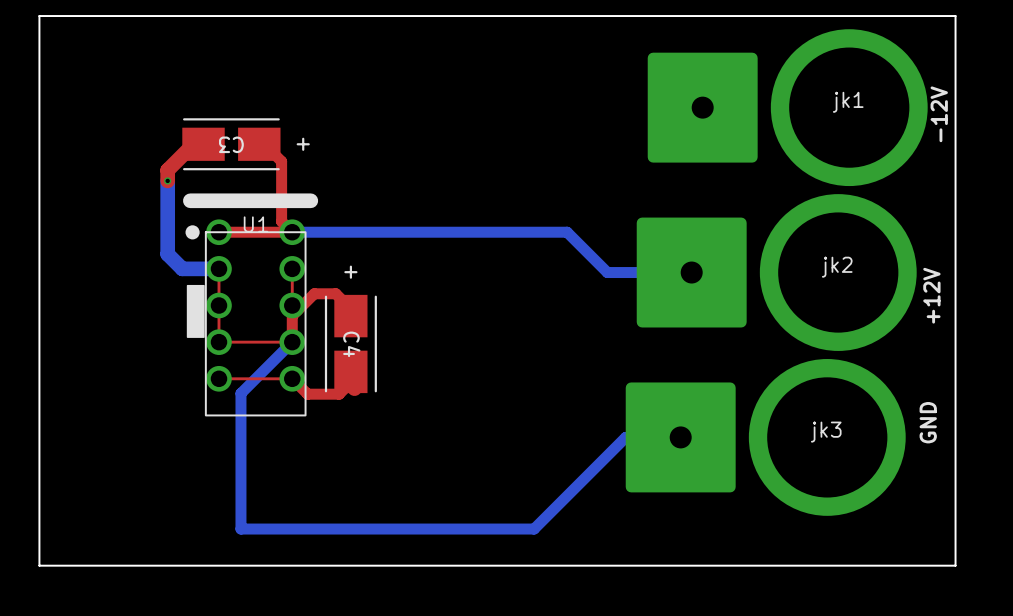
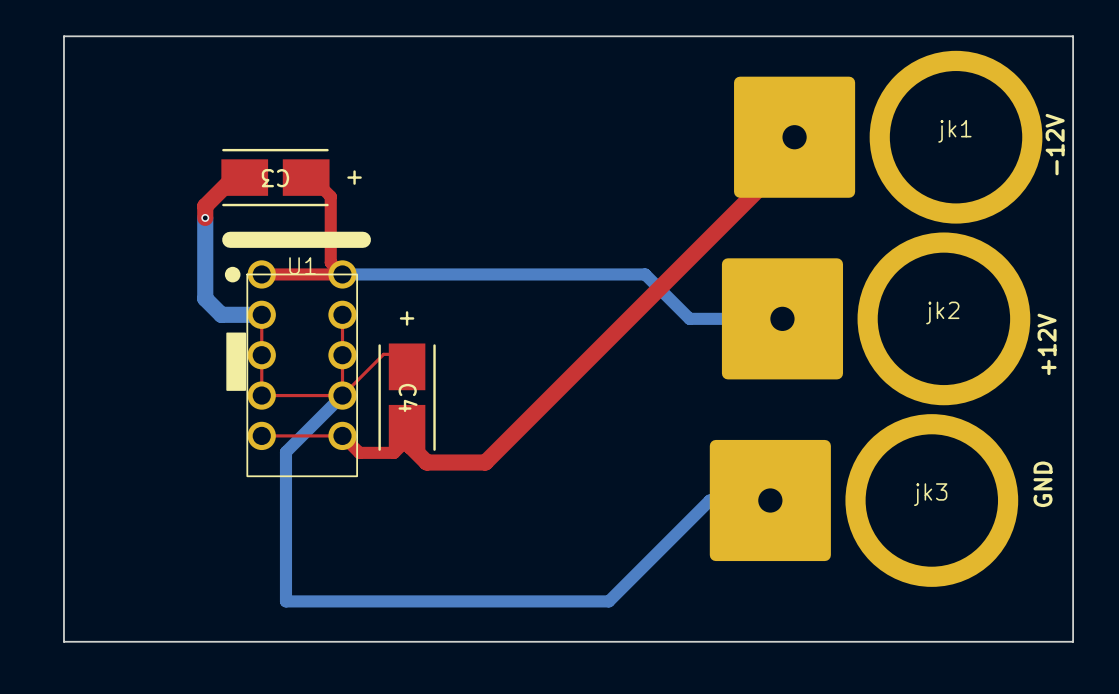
top track: none -> (794, 153) (485, 462) (426, 462) (411, 446)
top track: (350, 316) (350, 308) (335, 293) (314, 293) (292, 315) (292, 342) -> (392, 354) (383, 354) (342, 395)

